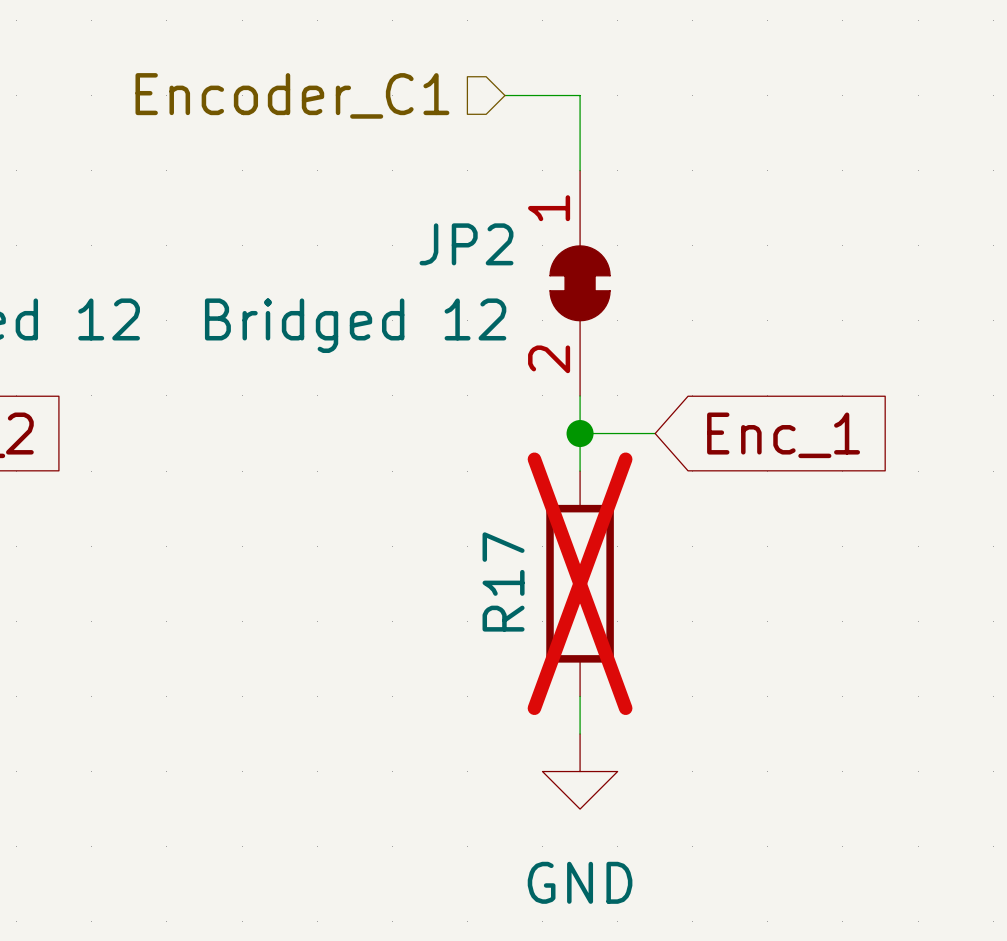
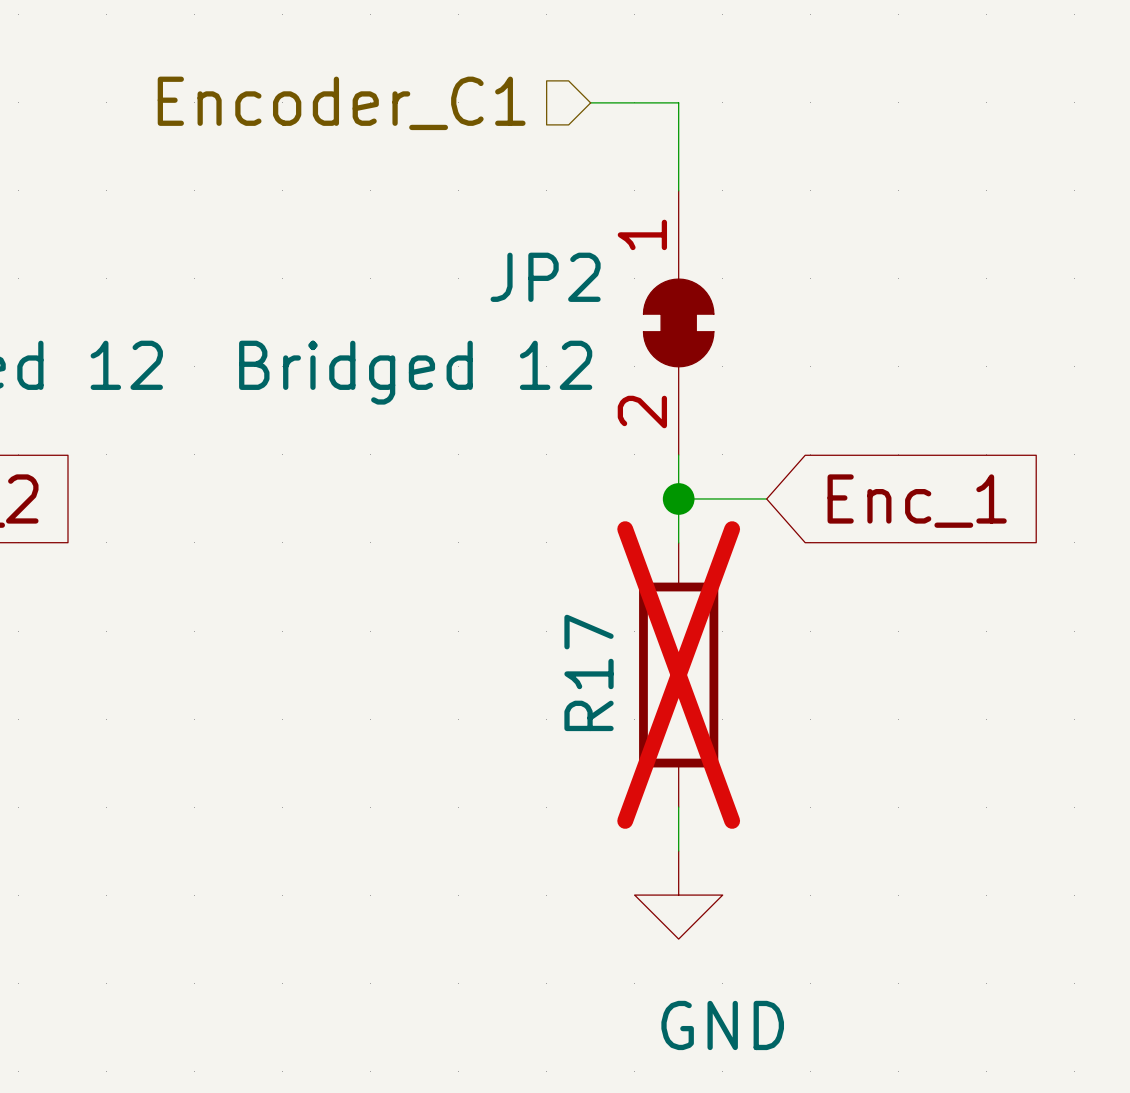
power symbol text position: GND (580, 882) -> GND (722, 1025)

